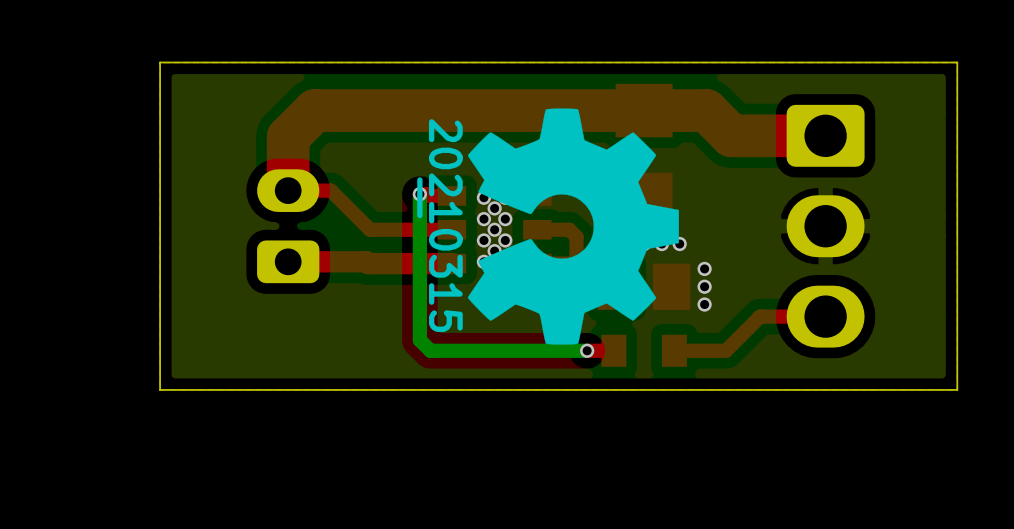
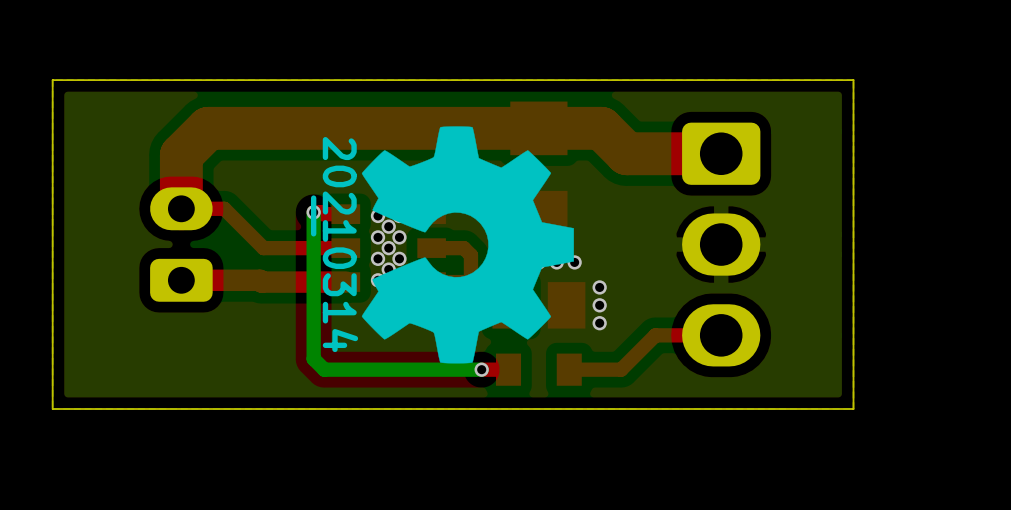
drawing shape: [417, 119, 463, 332] -> [310, 137, 359, 353]

